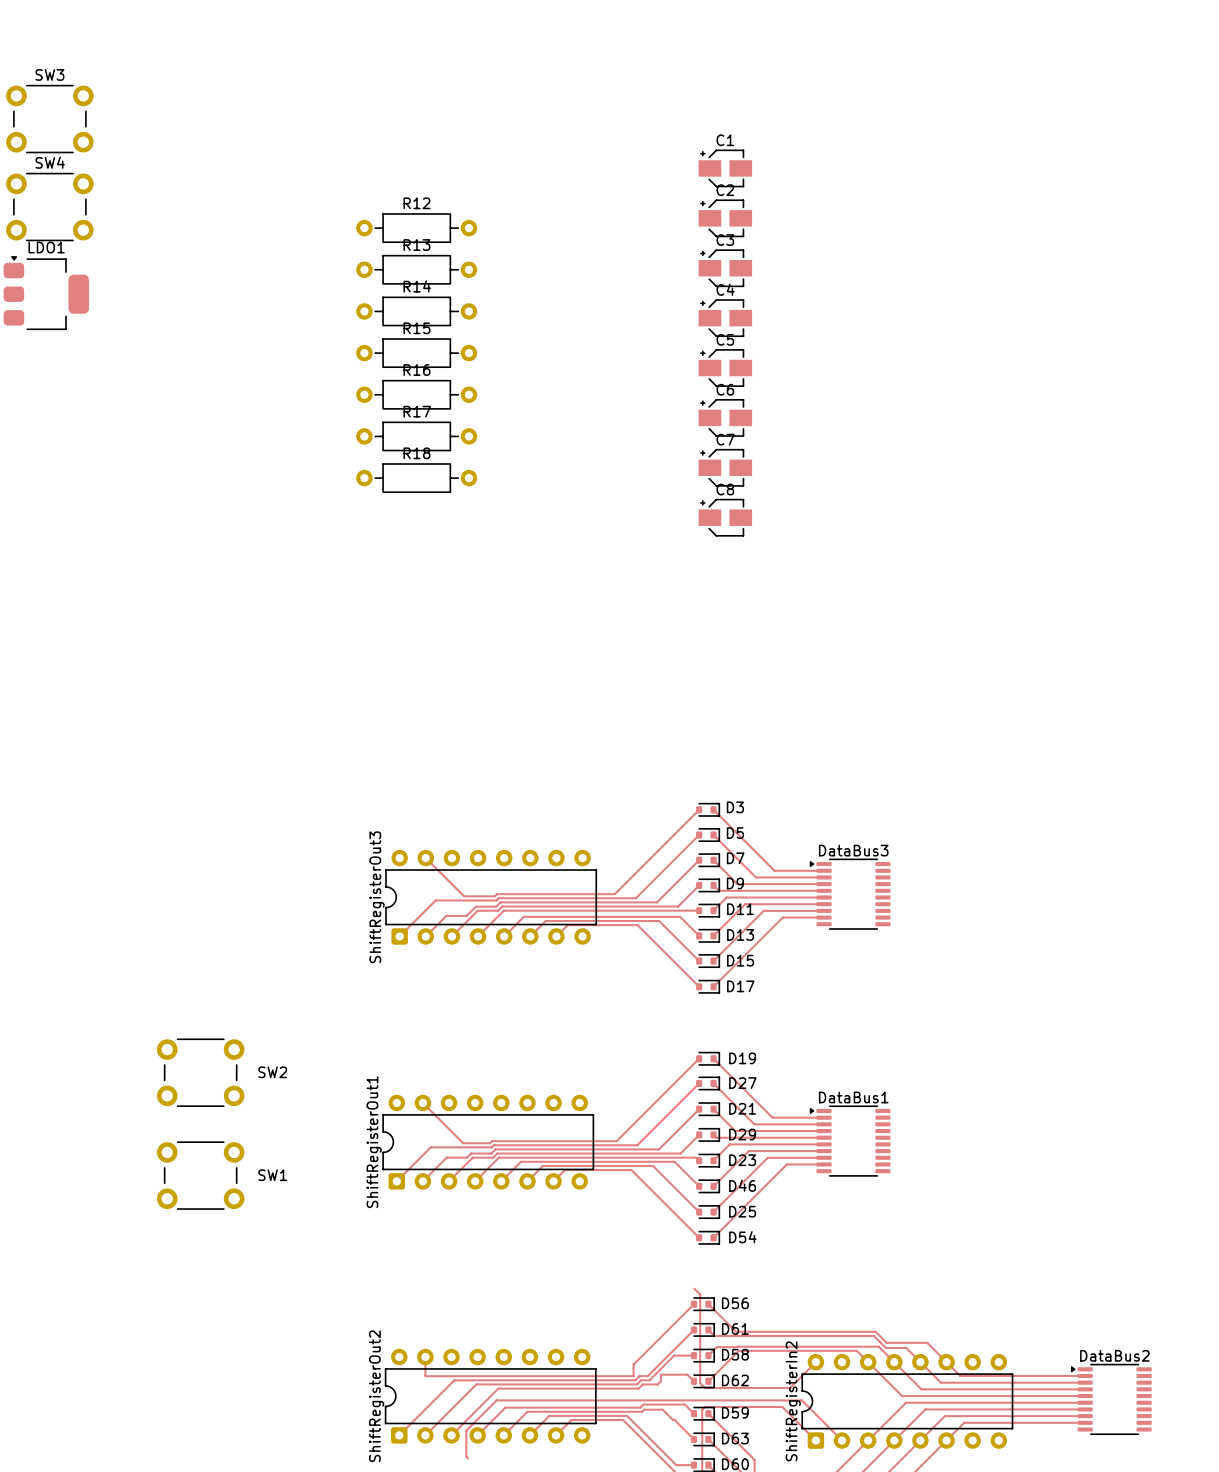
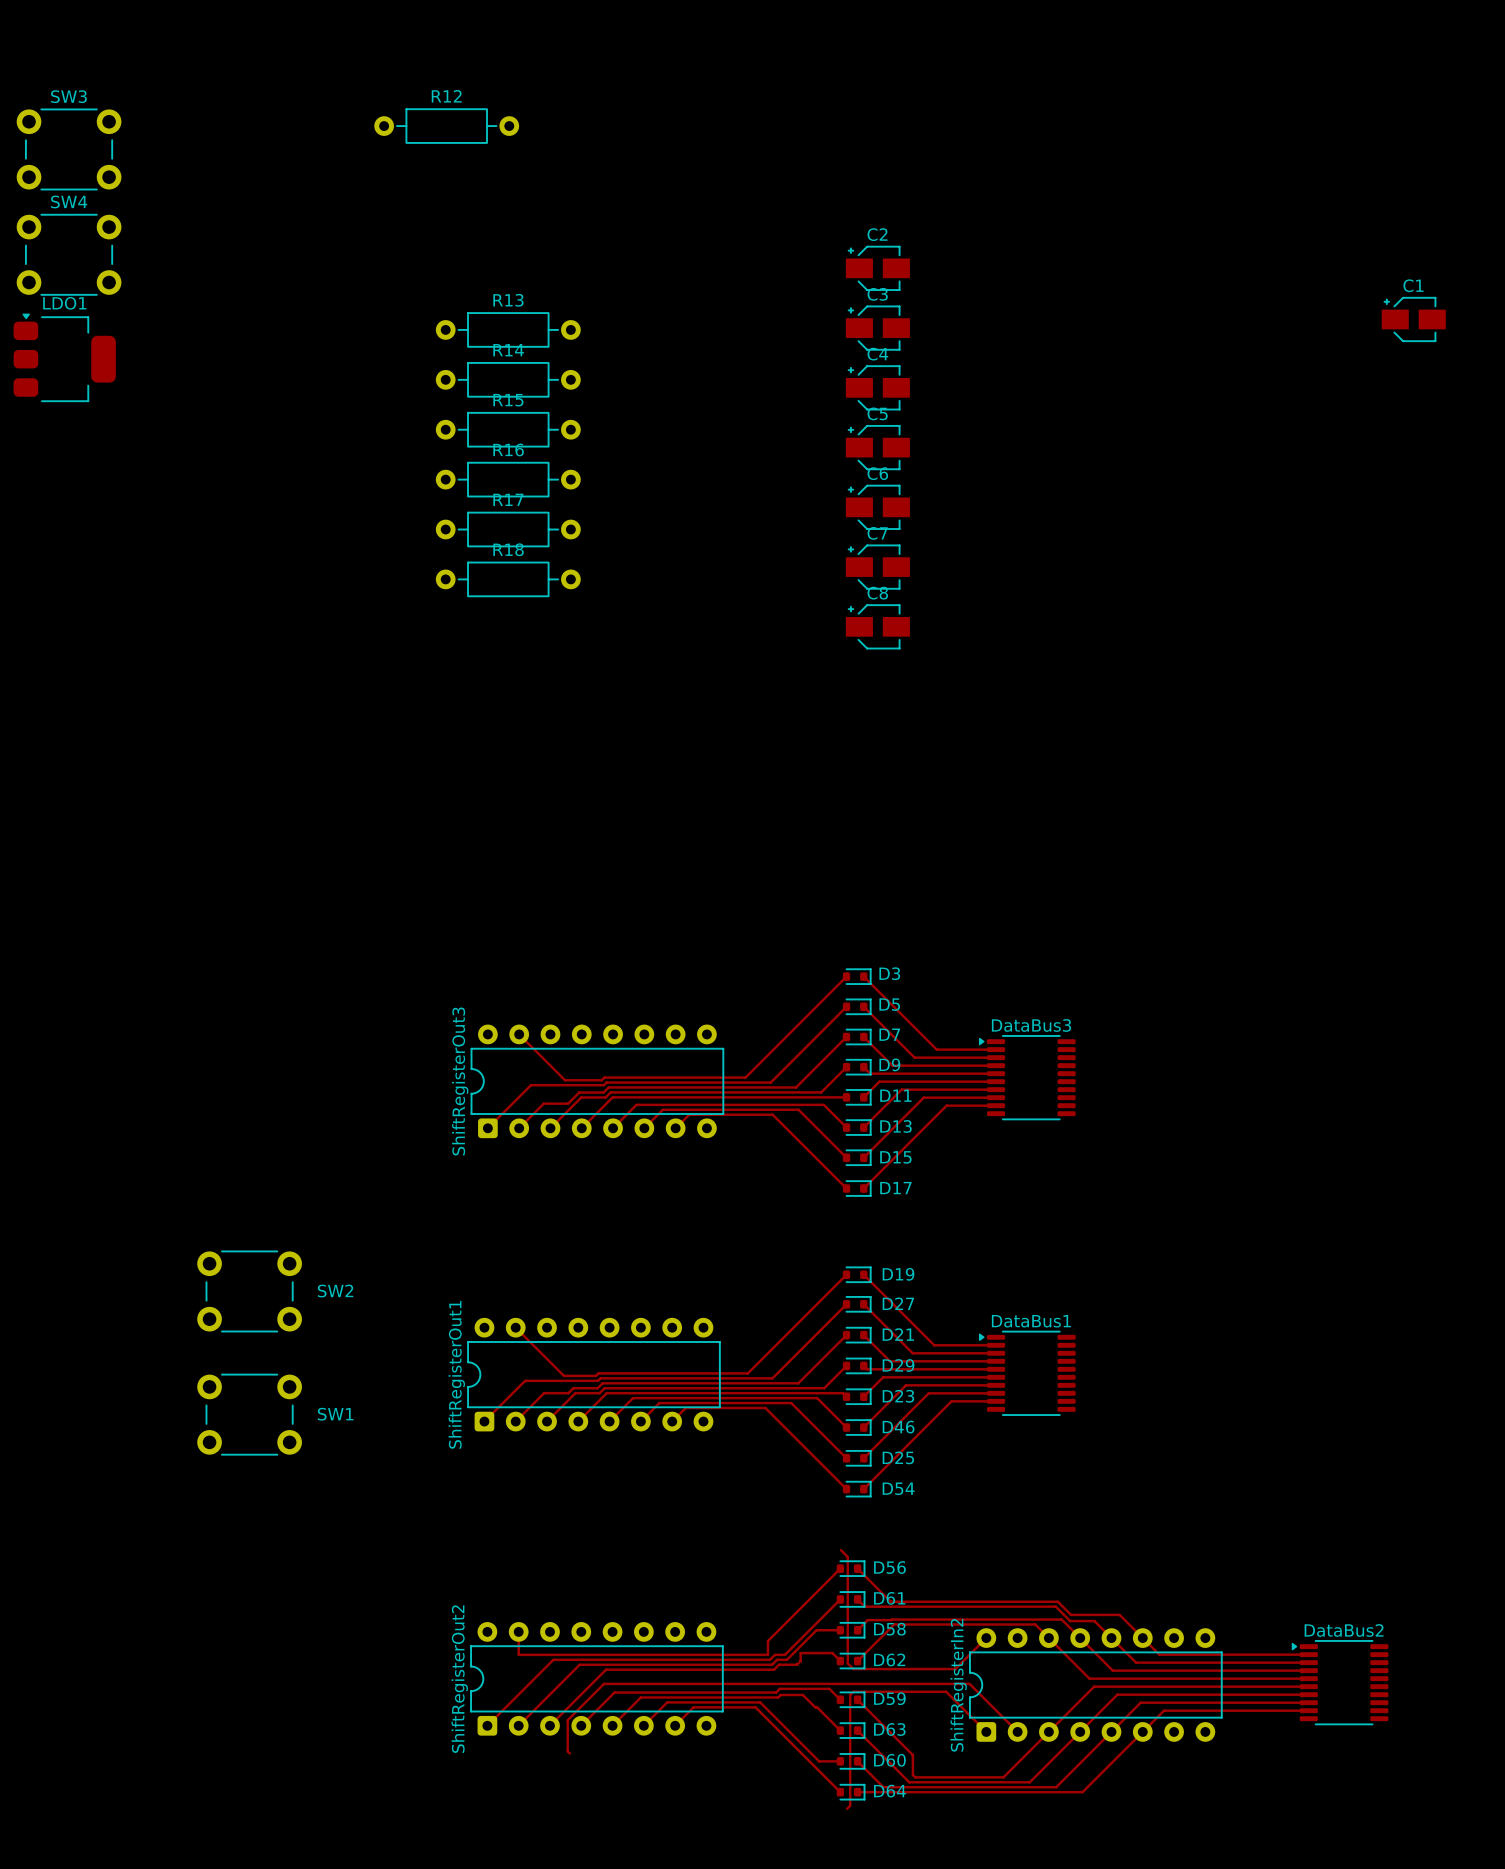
C1 position: (725, 168) -> (1413, 319)
R12 position: (416, 228) -> (446, 126)

